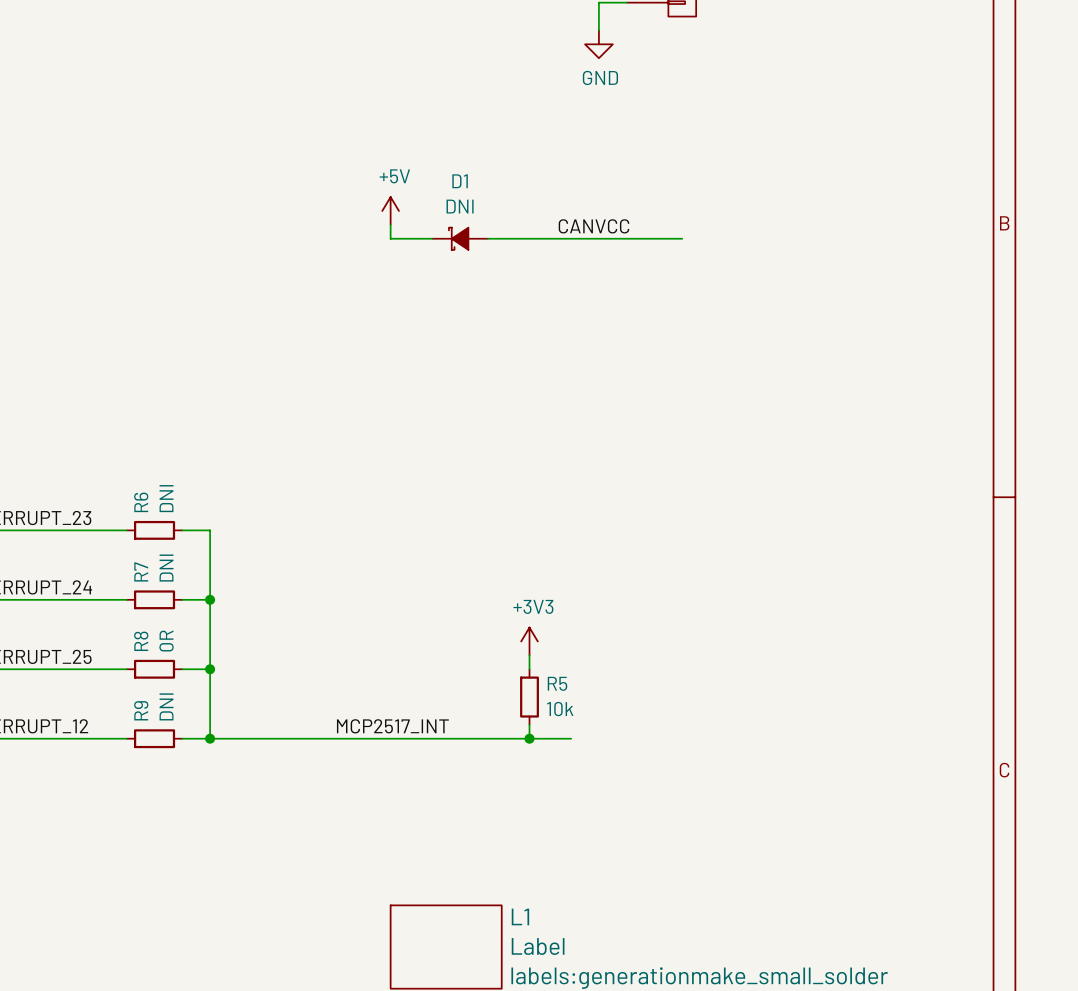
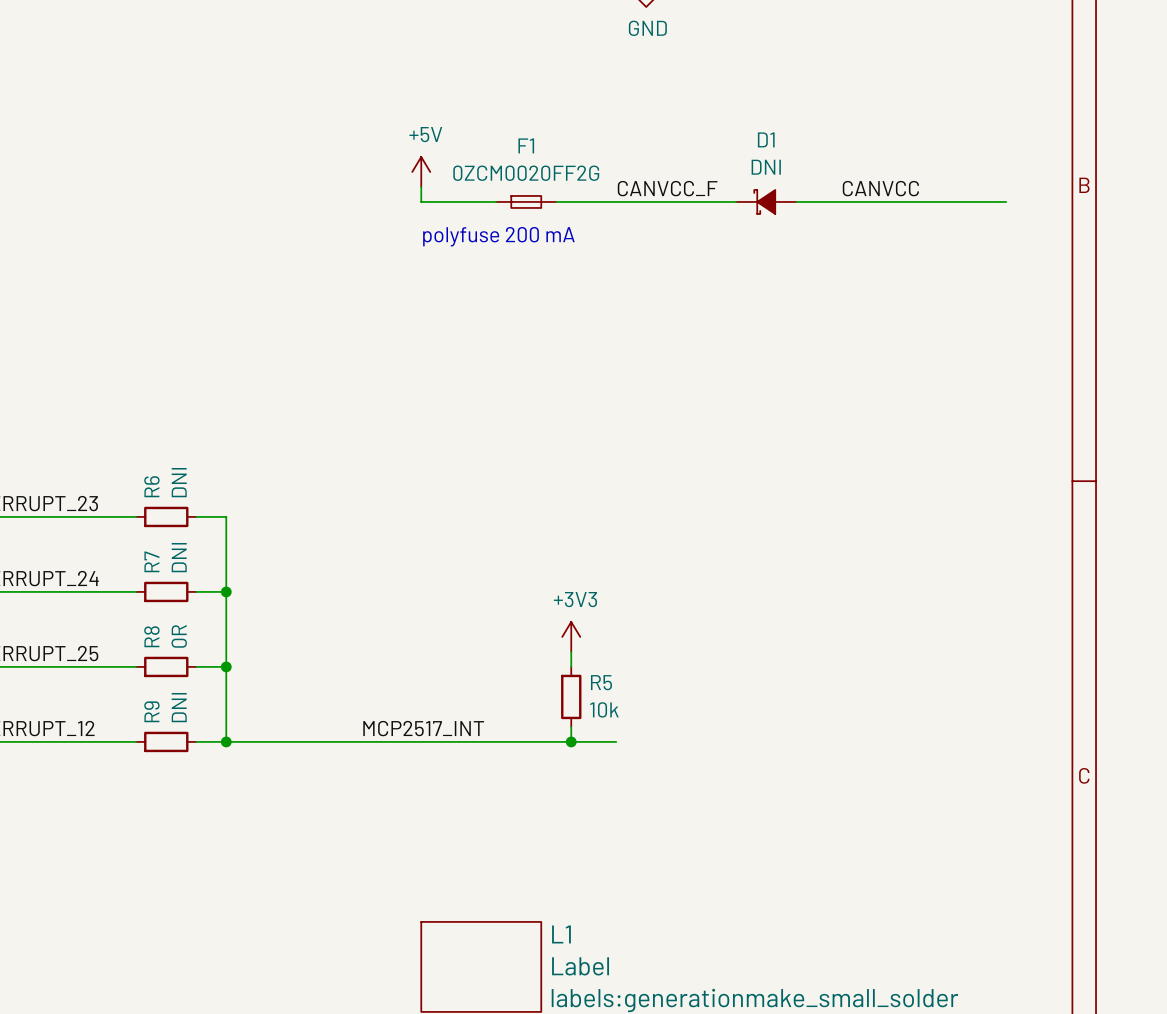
label position: CANVCC (593, 226) -> CANVCC (880, 188)
label: none -> CANVCC_F (667, 188)
D1 position: (460, 238) -> (766, 201)
F1: none -> 0ZCM0020FF2G (526, 201)
wire: none -> (796, 201) (1006, 201)
text: none -> polyfuse 200 mA (498, 236)

